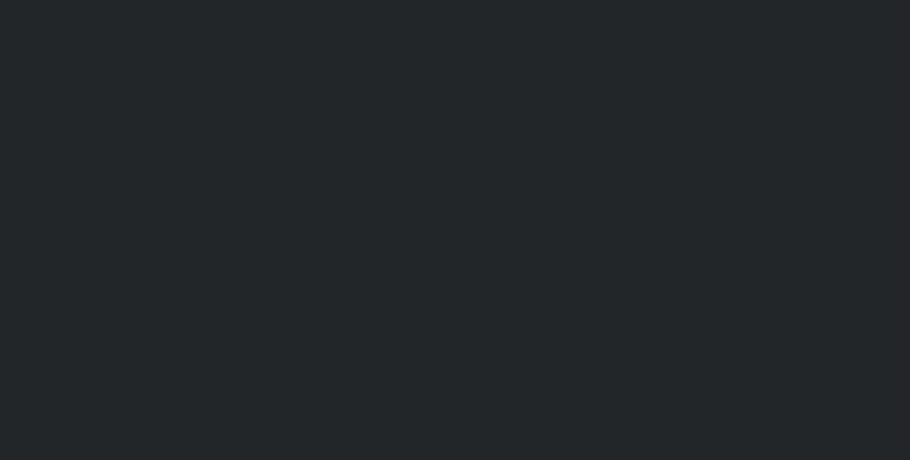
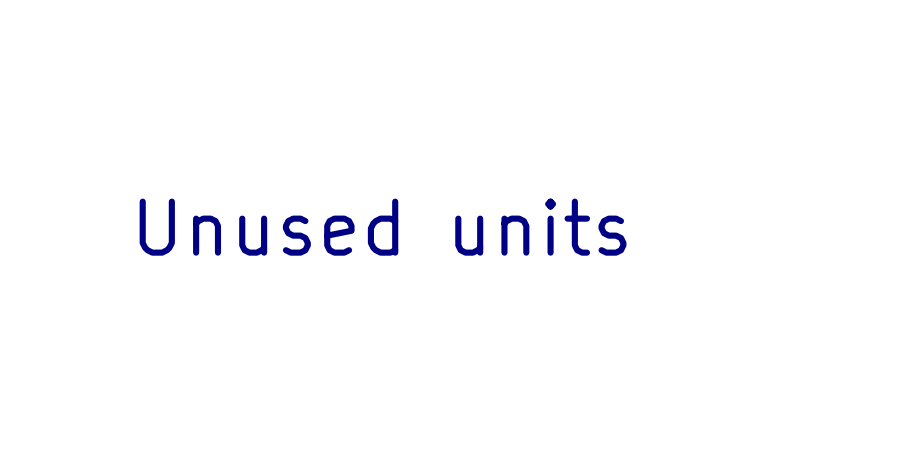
text: none -> Unused units (383, 227)

